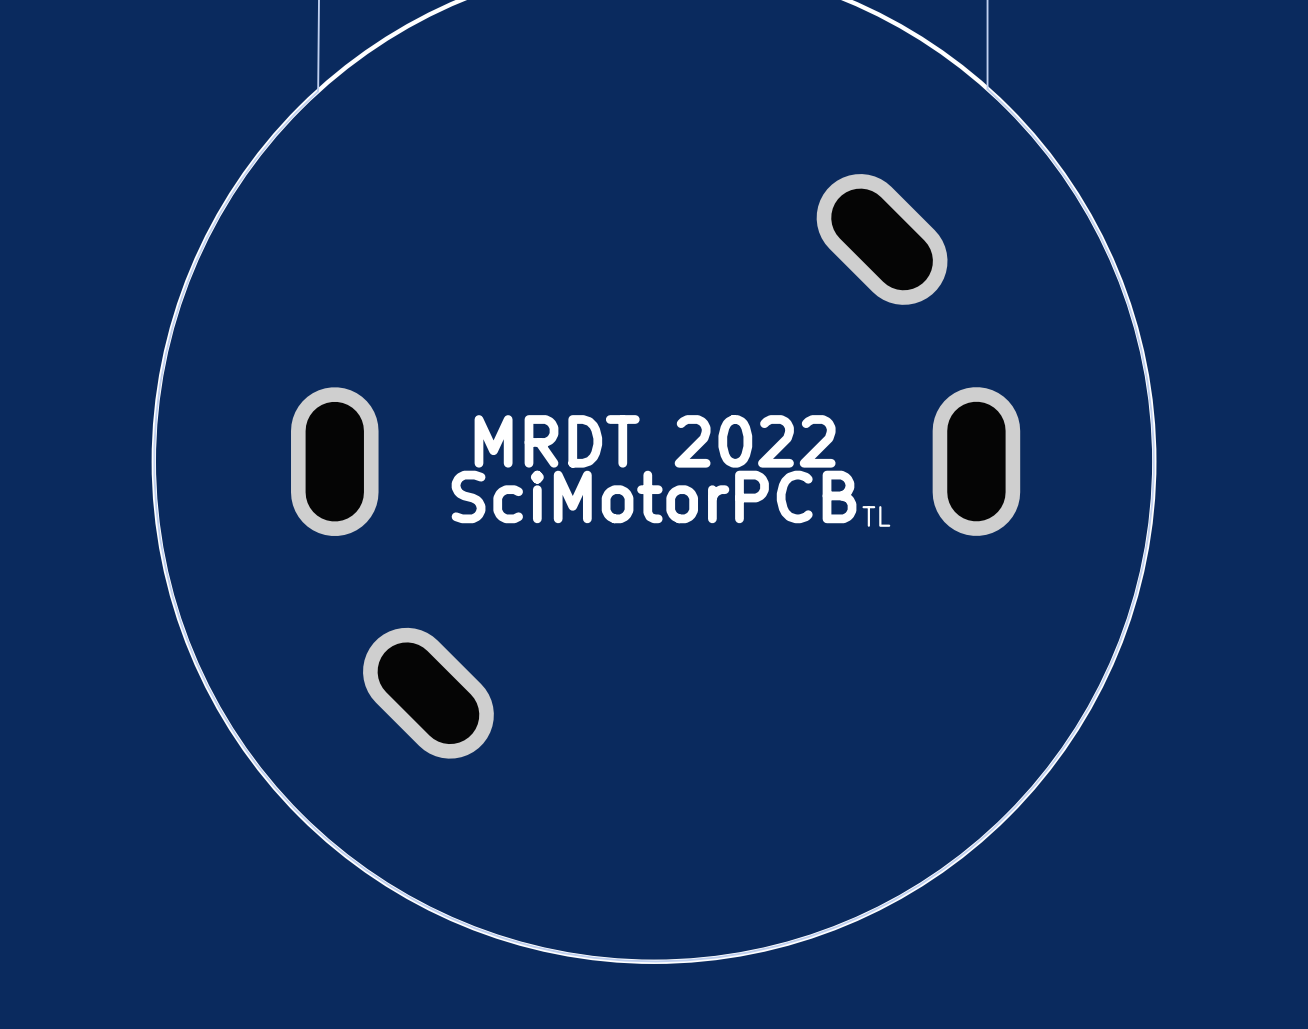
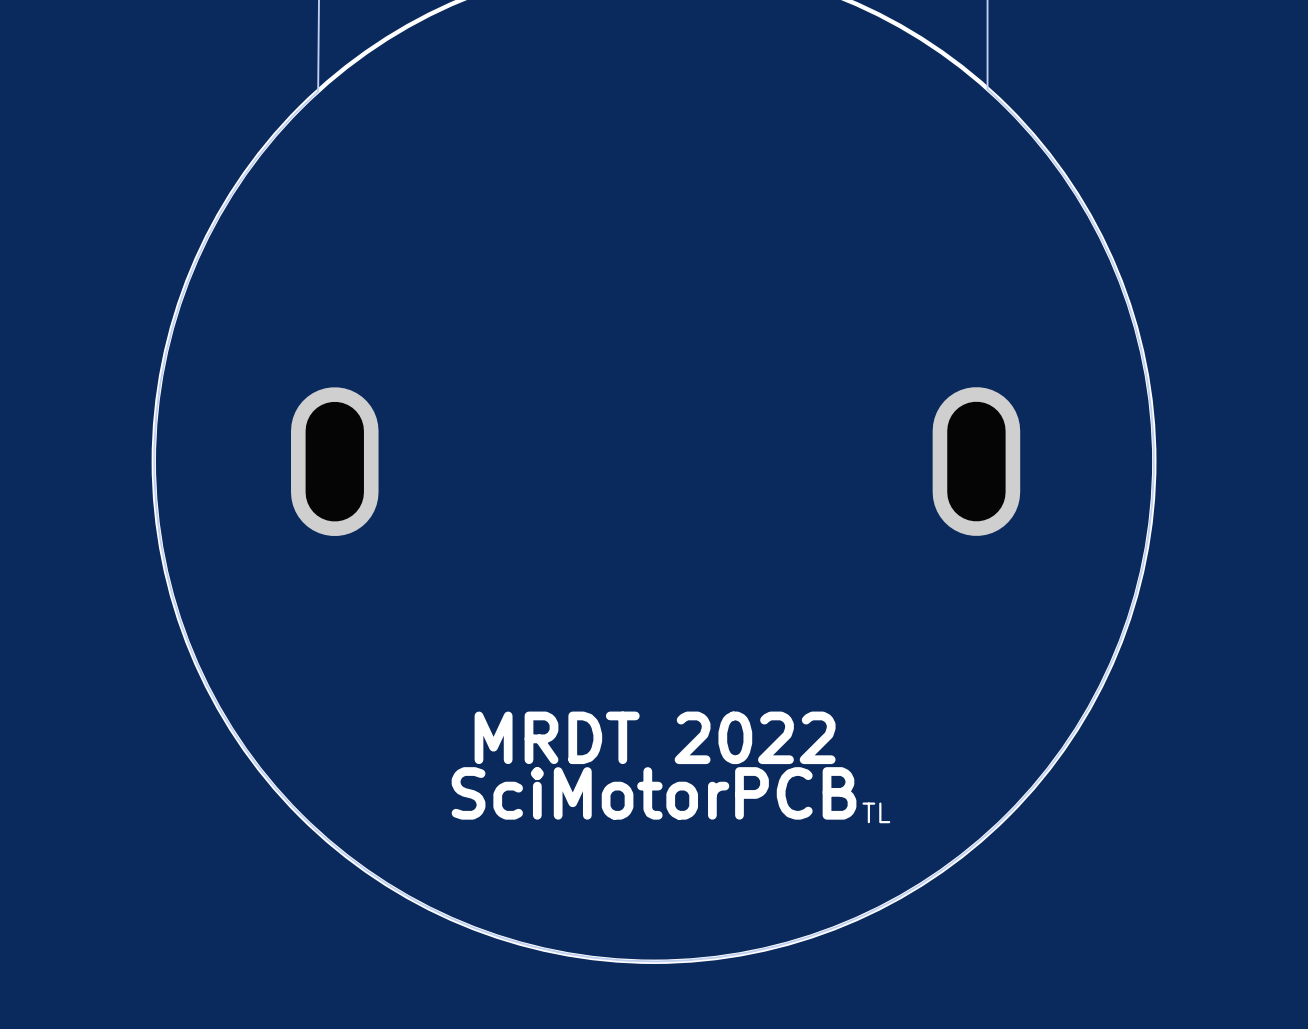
part: (882, 239) -> none
text position: MRDT 2022 (655, 441) -> MRDT 2022 (655, 737)
text position: SciMotorPCB (654, 496) -> SciMotorPCB (654, 793)
text position: TL (876, 516) -> TL (876, 812)
part: (428, 693) -> none

